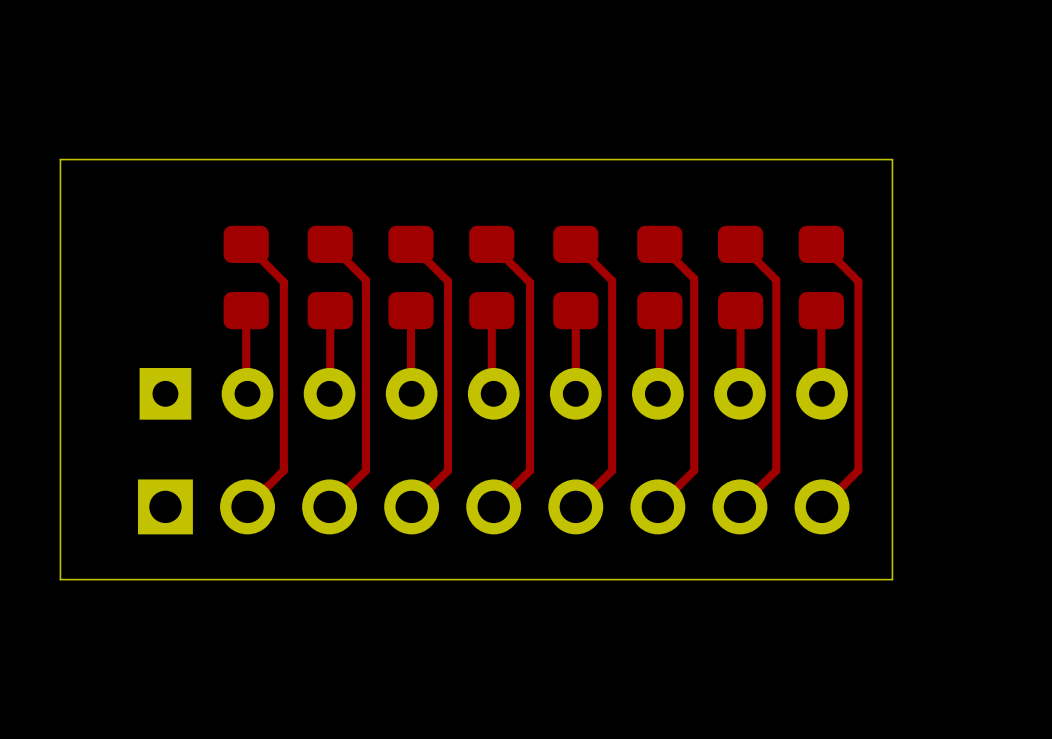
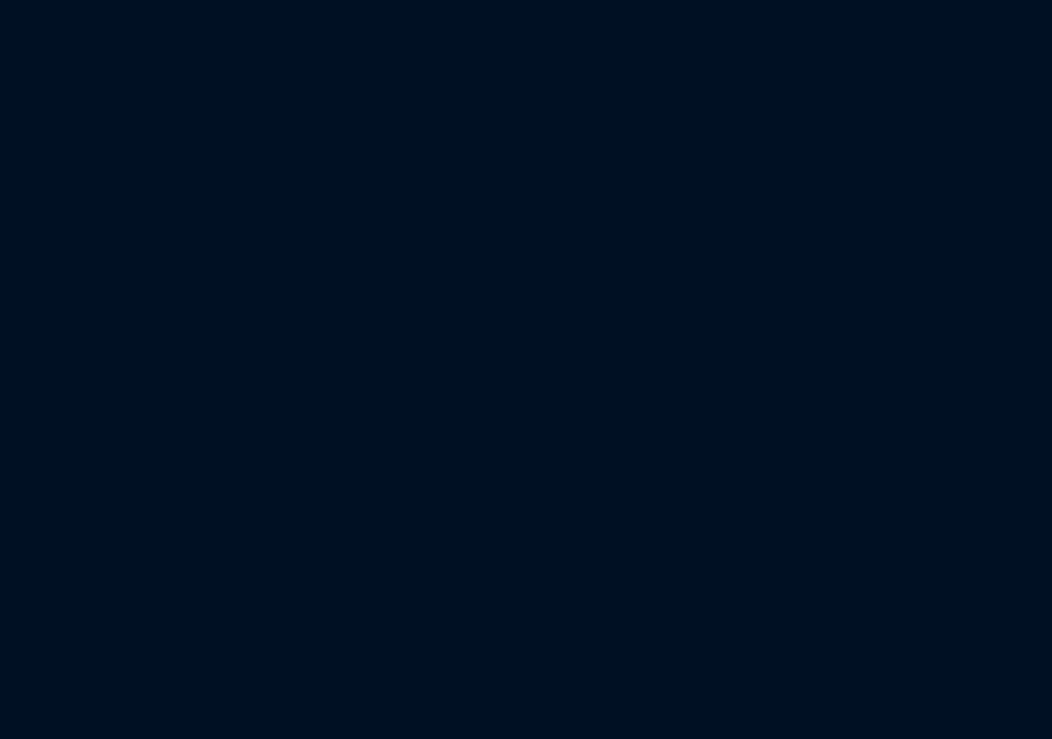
board edge: (892, 159) (892, 579) (60, 579) (60, 159) (892, 159) -> none
top track: (246, 244) (283, 282) (283, 470) (247, 506) -> none
top track: (330, 244) (365, 280) (365, 470) (329, 506) -> none
top track: (411, 244) (448, 281) (448, 470) (411, 506) -> none
top track: (491, 244) (530, 282) (530, 470) (493, 506) -> none
top track: (575, 244) (612, 280) (612, 470) (575, 506) -> none
top track: (659, 244) (694, 278) (694, 470) (657, 506) -> none
top track: (740, 244) (776, 280) (776, 470) (739, 506) -> none
top track: (821, 244) (858, 281) (858, 470) (822, 506) -> none
part: (246, 277) -> none
part: (330, 277) -> none
part: (411, 277) -> none
part: (491, 277) -> none
part: (575, 277) -> none
part: (659, 277) -> none
part: (740, 277) -> none
part: (821, 277) -> none
top track: (246, 310) (247, 393) -> none
top track: (330, 310) (329, 393) -> none
top track: (411, 310) (411, 393) -> none
top track: (491, 310) (491, 391) (493, 393) -> none
top track: (575, 310) (575, 393) -> none
top track: (659, 310) (659, 391) (657, 393) -> none
top track: (740, 310) (739, 393) -> none
top track: (821, 310) (822, 393) -> none
part: (493, 393) -> none
part: (493, 506) -> none

